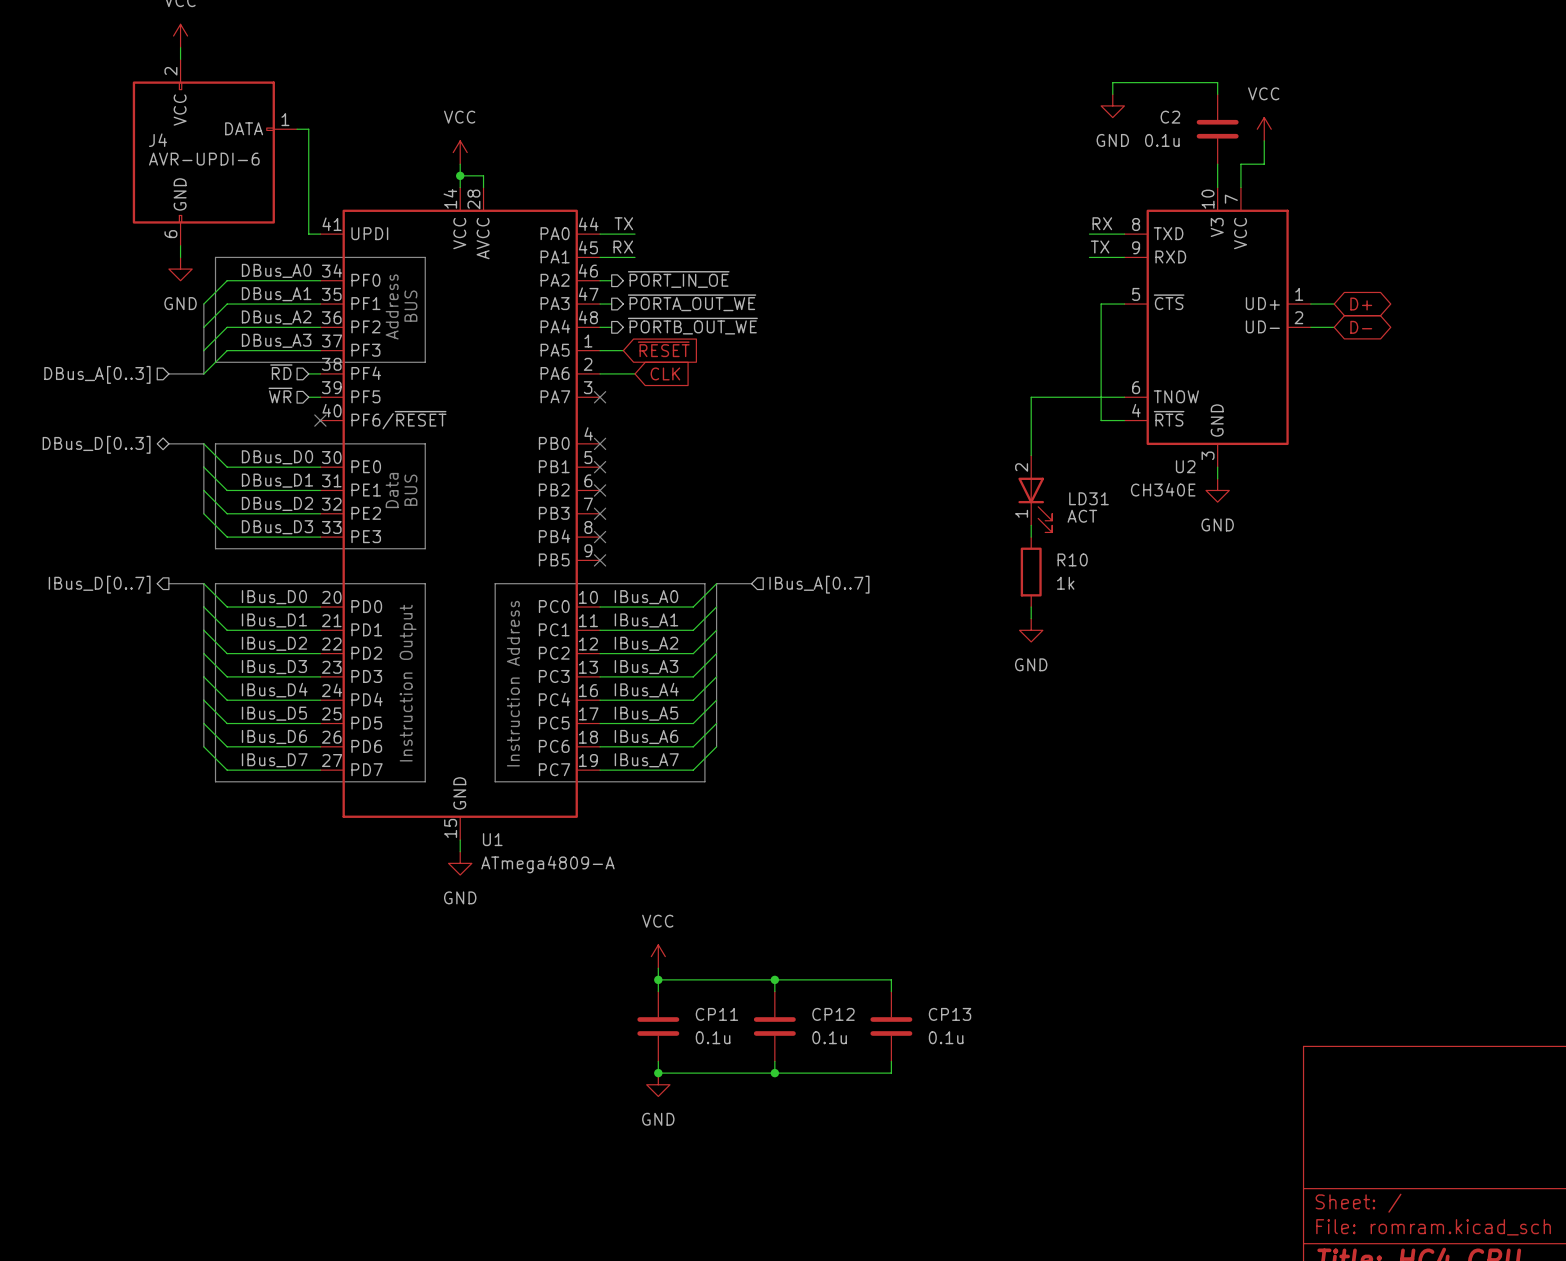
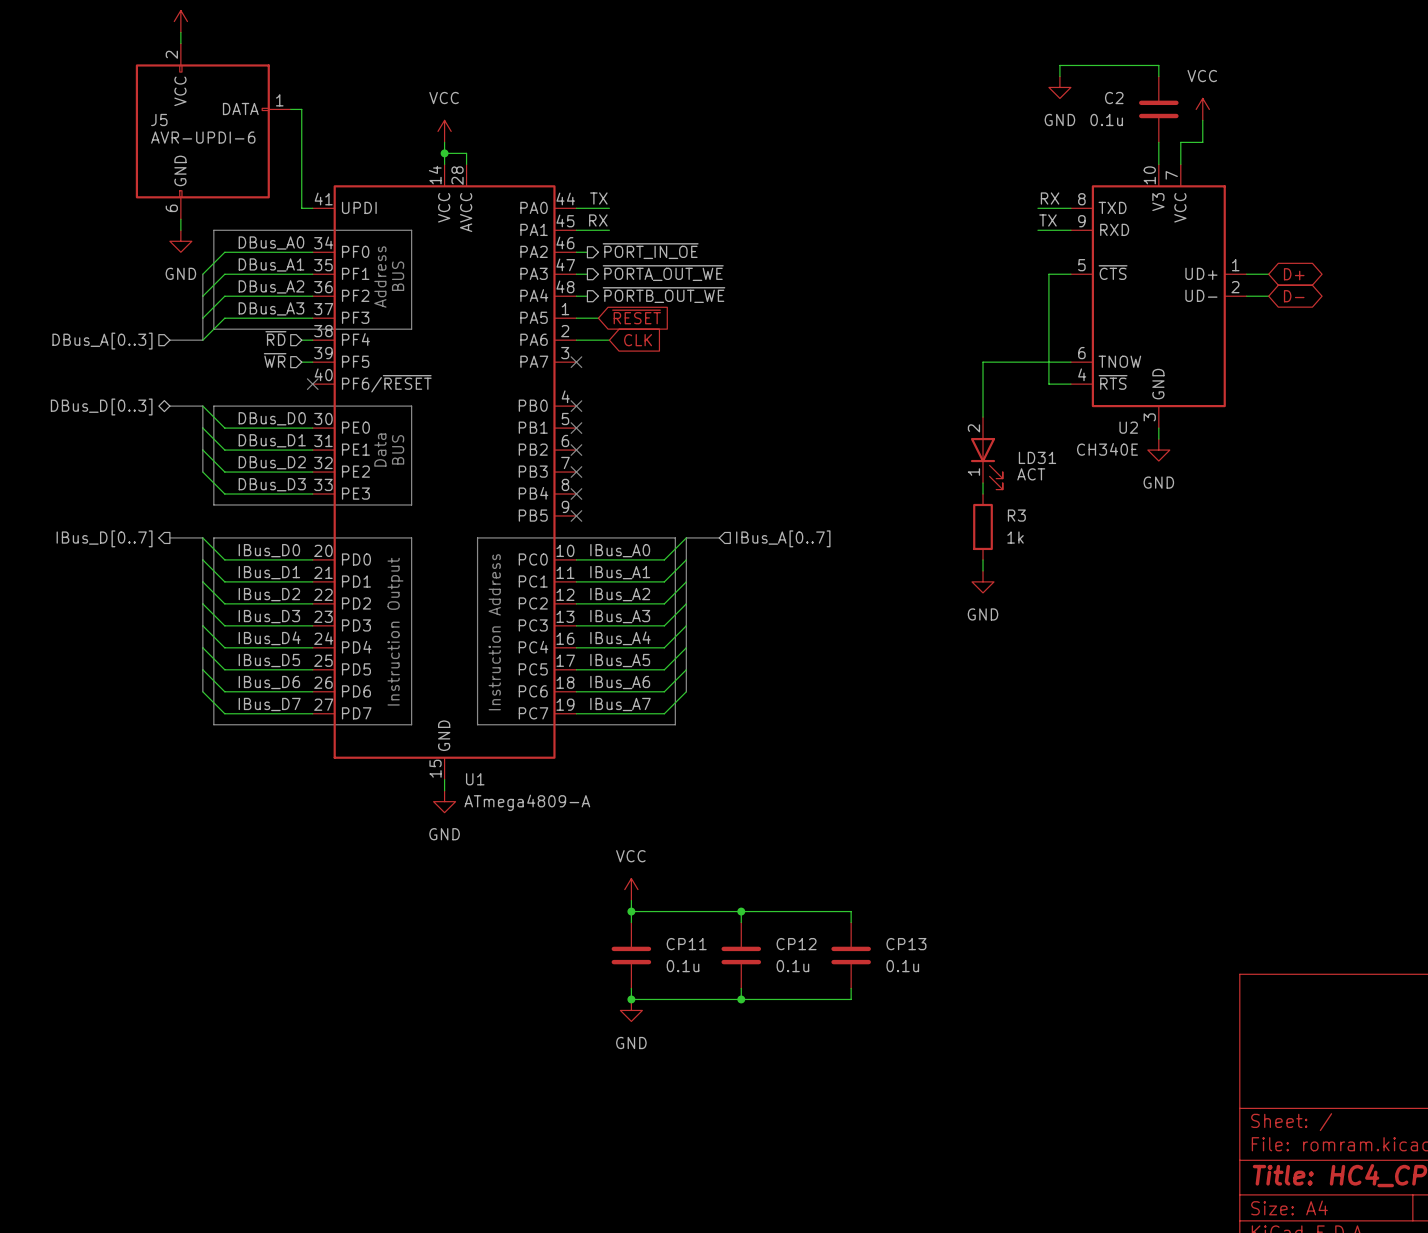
J4 name: J4 (157, 140) -> J5 (159, 119)
R10 name: R10 (1072, 559) -> R3 (1016, 515)

